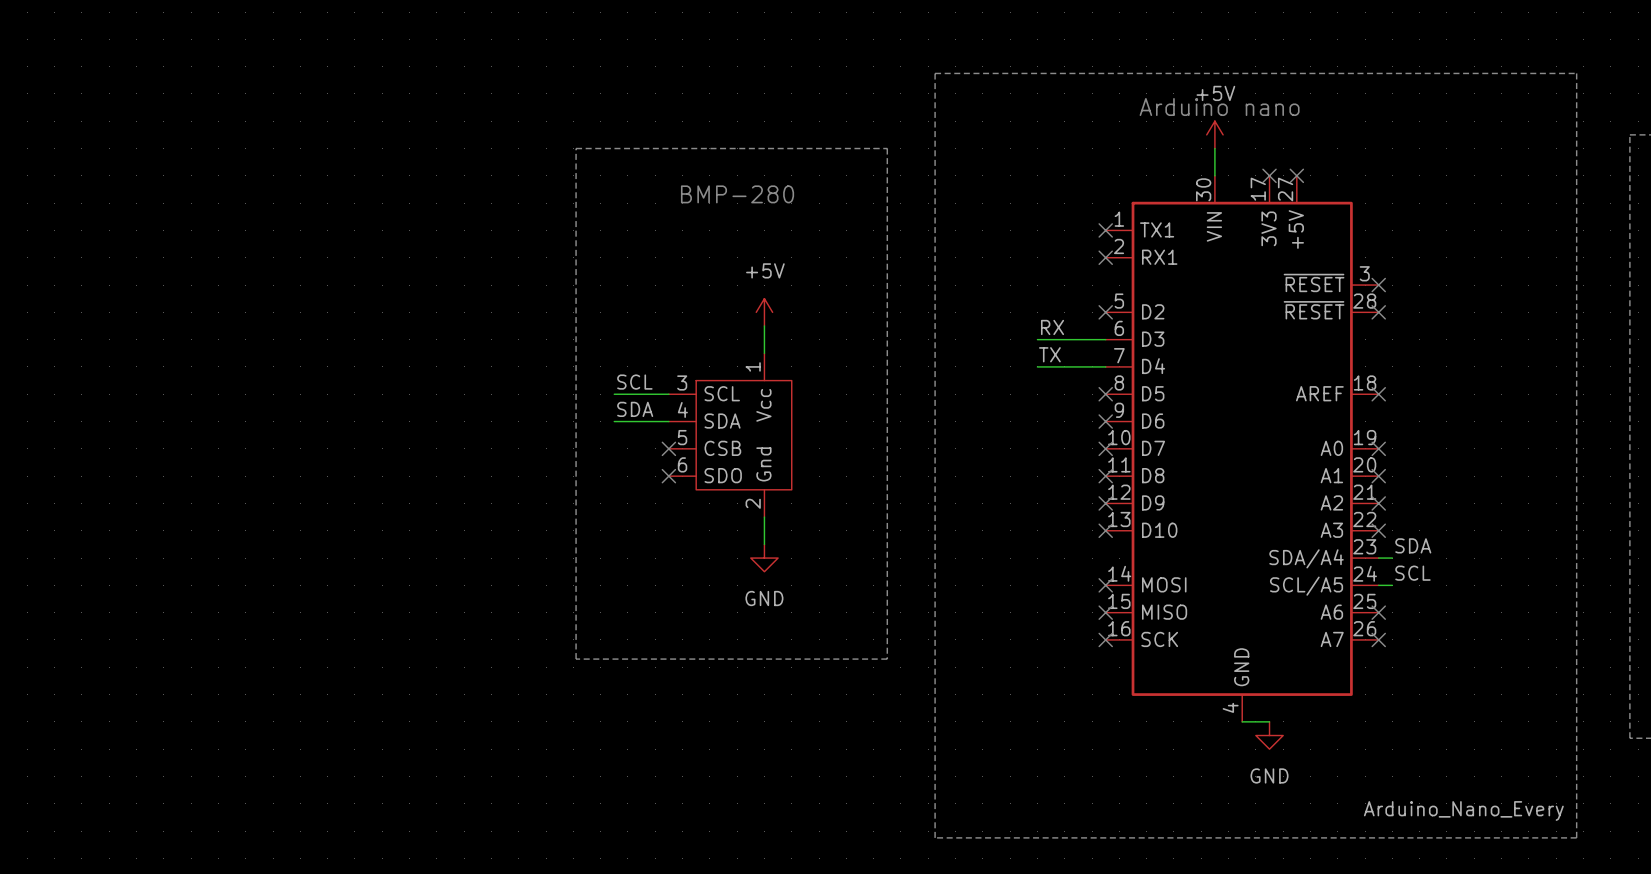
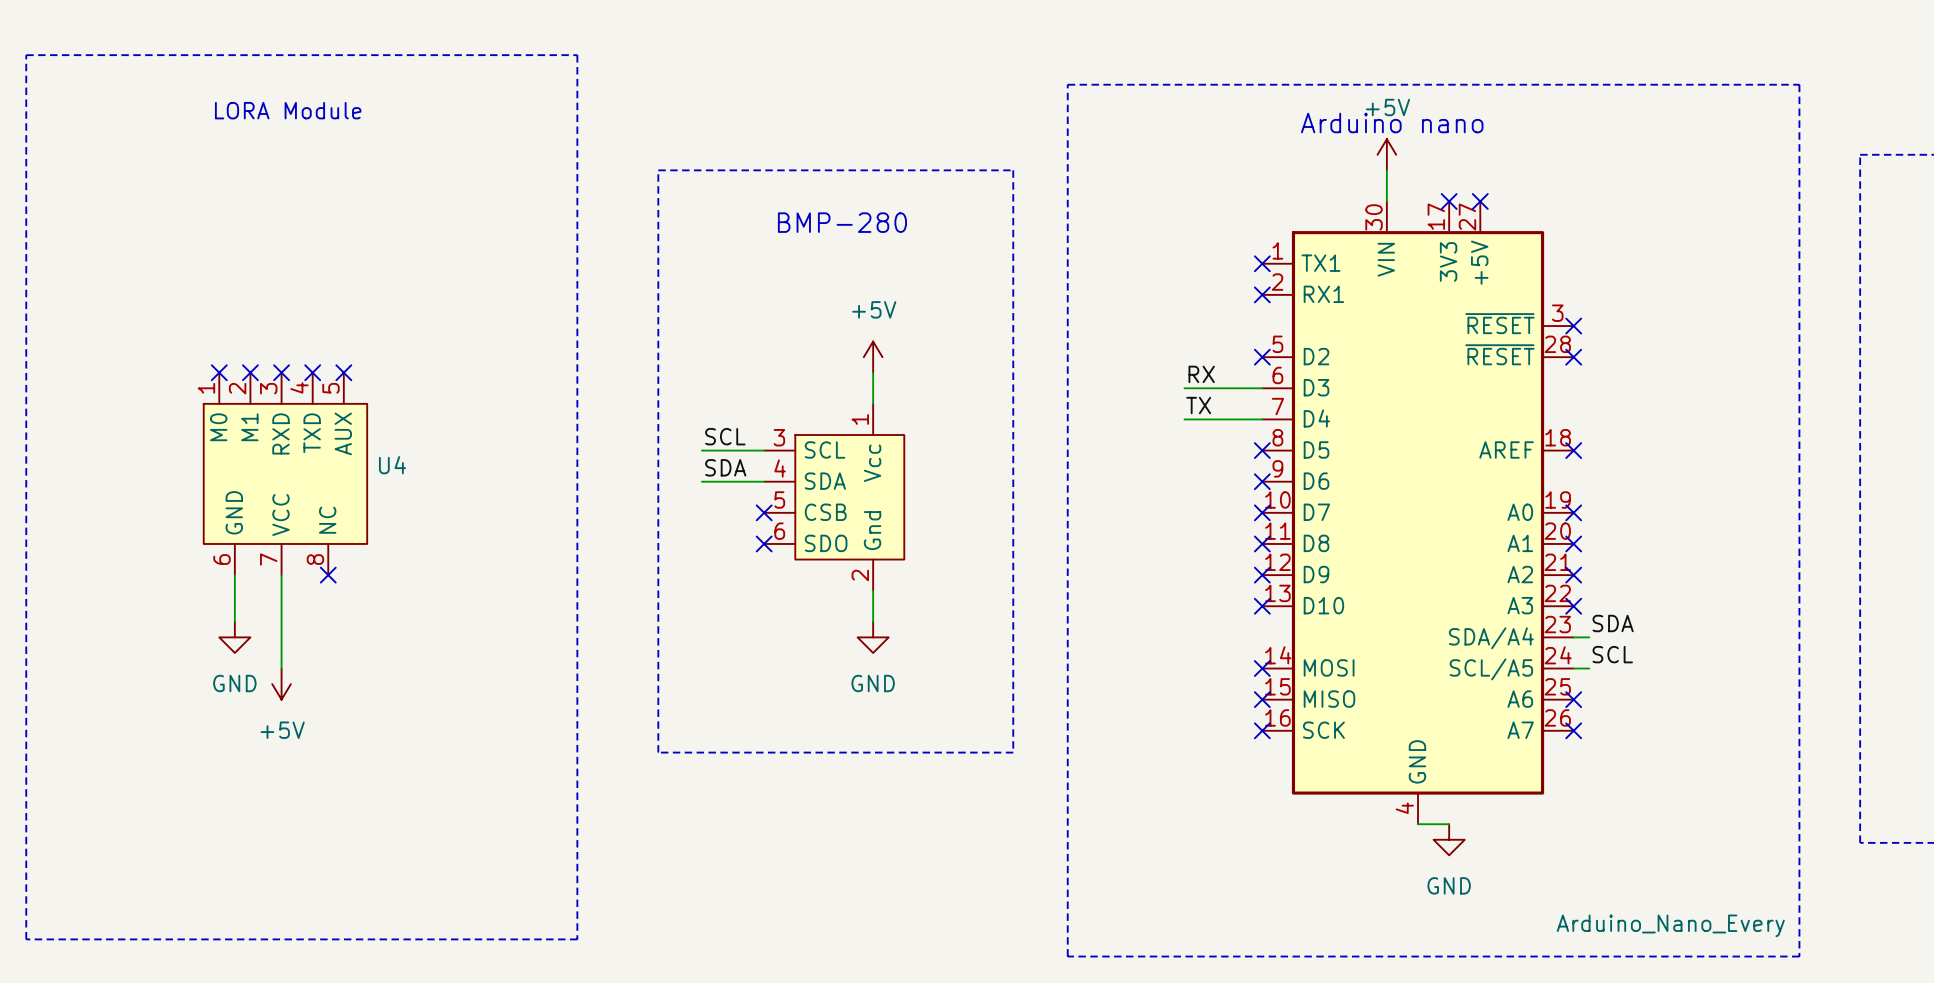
line: none -> (26, 55) (577, 55) (577, 939) (26, 939) (26, 55)
text: none -> LORA Module (288, 110)
no-connect mark: none -> (219, 372)
no-connect mark: none -> (250, 372)
no-connect mark: none -> (281, 372)
no-connect mark: none -> (312, 372)
no-connect mark: none -> (343, 372)
U4: none -> (285, 473)
wire: none -> (234, 575) (234, 621)
wire: none -> (281, 575) (281, 668)
no-connect mark: none -> (328, 575)
power symbol: none -> GND (234, 637)
power symbol: none -> +5V (281, 684)

